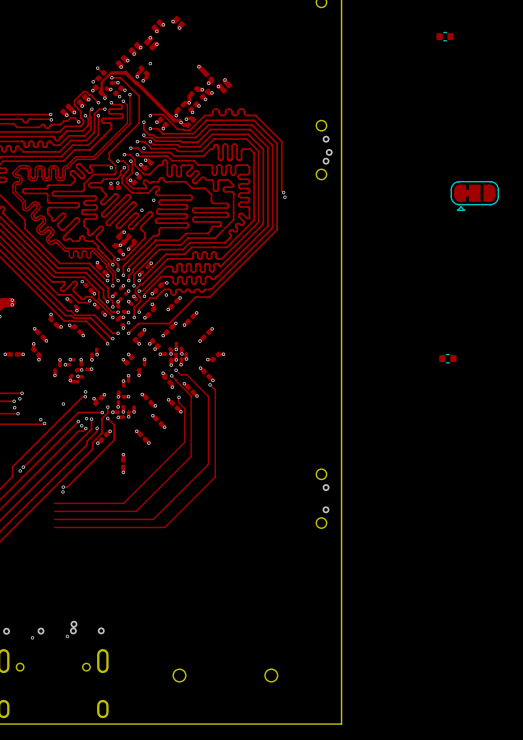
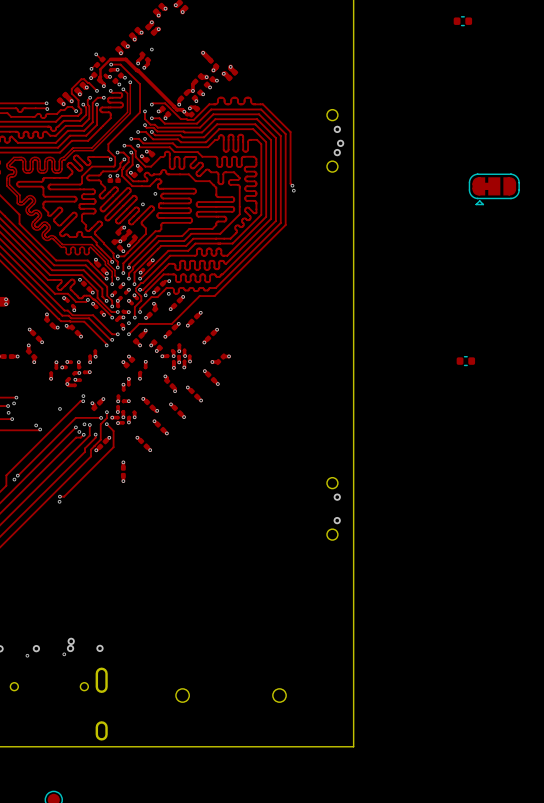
track: (176, 370) (180, 374) (186, 374) (208, 396) (208, 464) (153, 519) (54, 519) -> none
via: (176, 370) -> none
track: (171, 375) (191, 395) (191, 456) (136, 511) (54, 511) -> none
via: (171, 375) -> none
track: (210, 384) (215, 390) (215, 477) (164, 527) (54, 527) -> none
via: (210, 384) -> none
track: (179, 397) (178, 402) (184, 408) (184, 442) (123, 503) (54, 503) -> none
via: (179, 397) -> none

